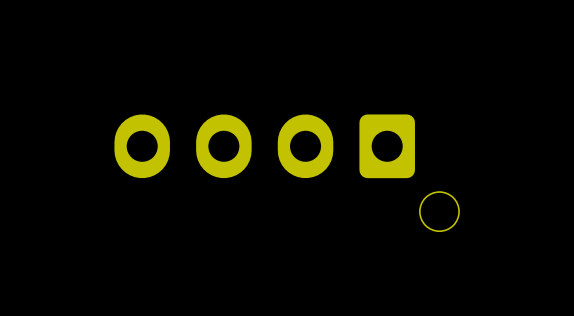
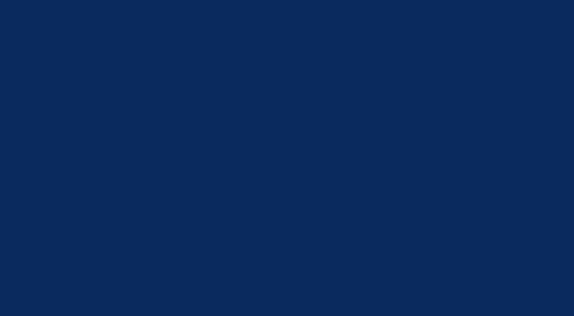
part: (286, 172) -> none

